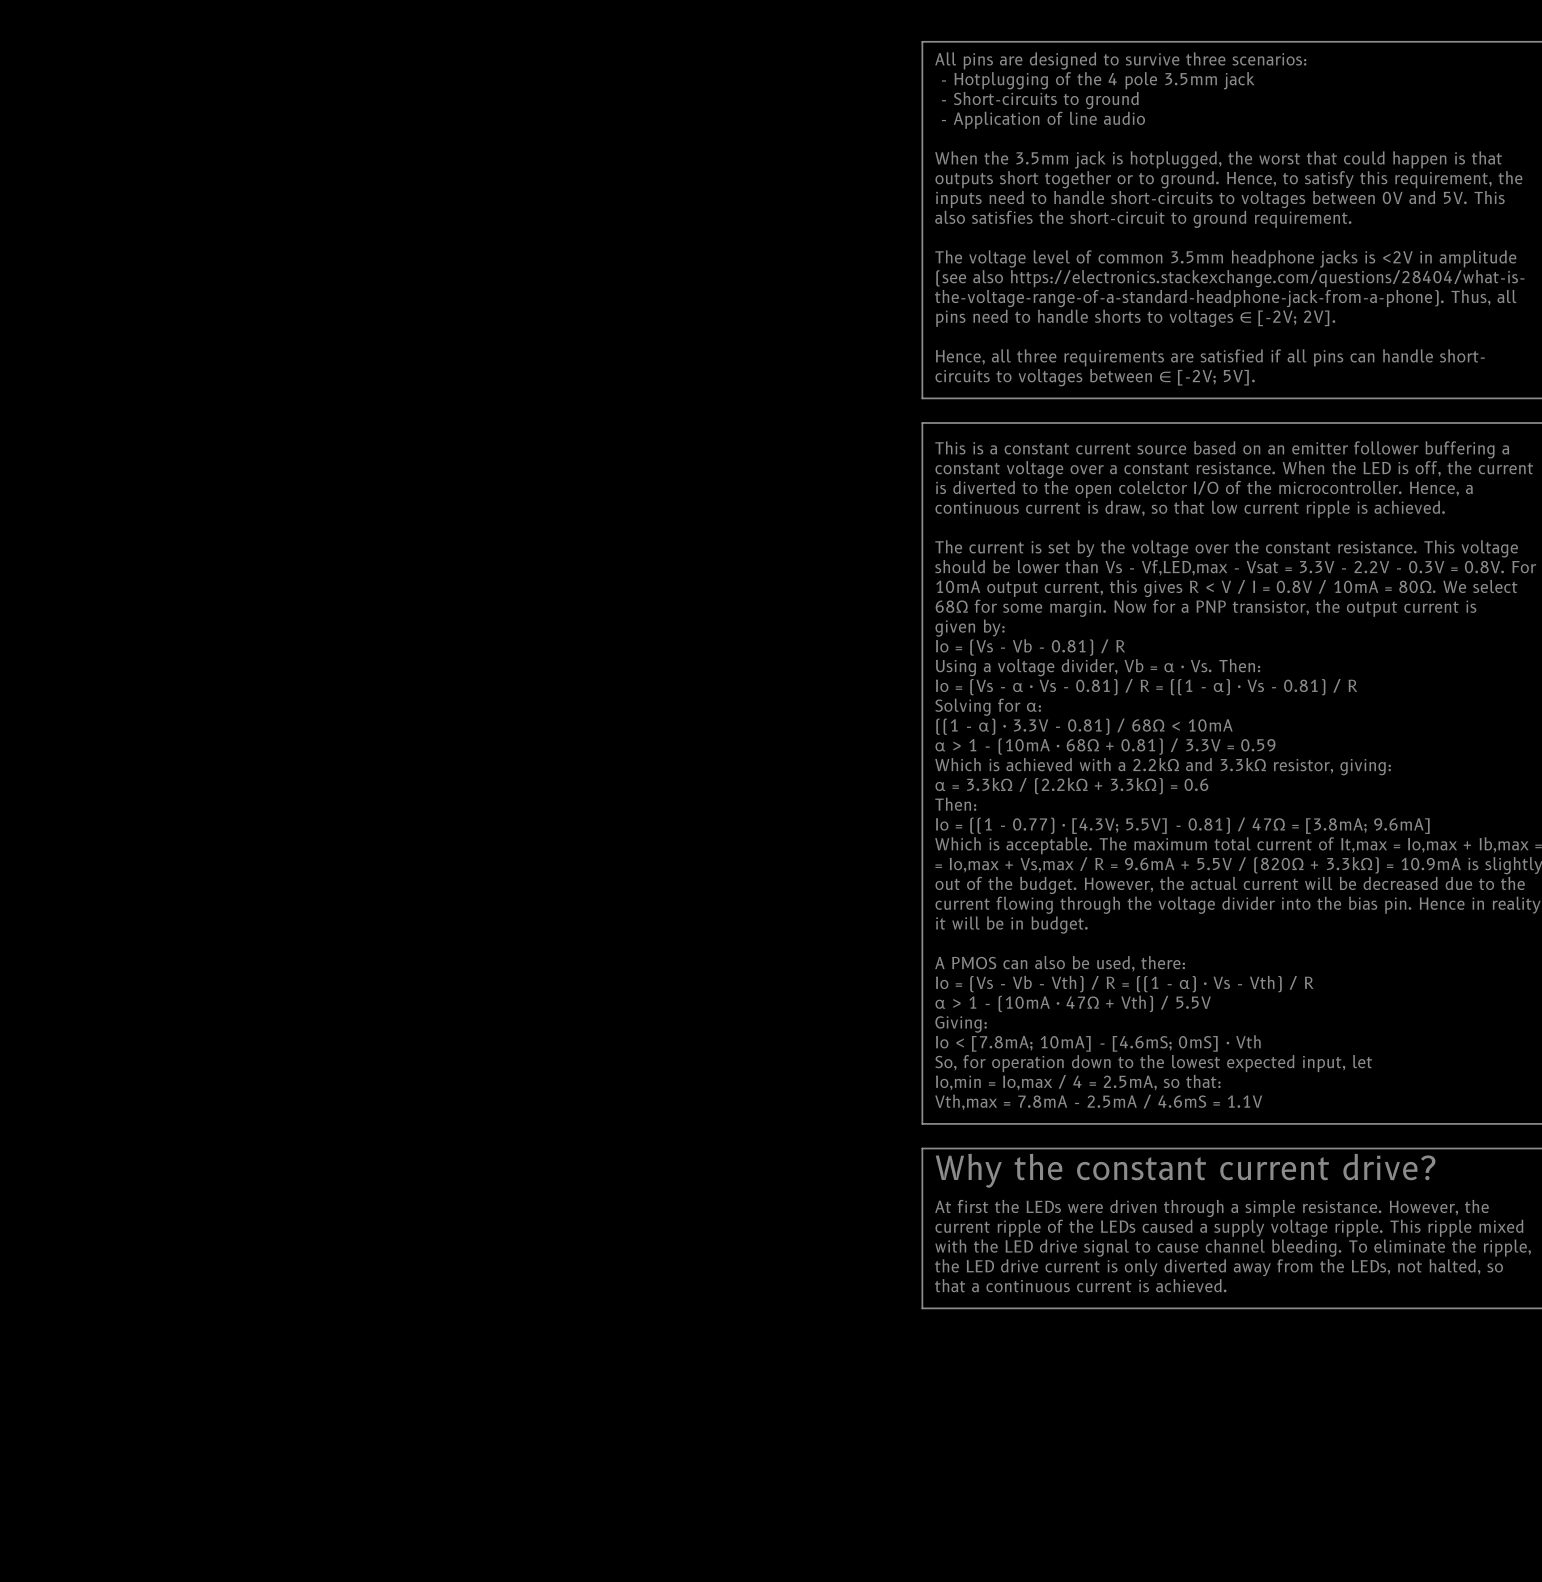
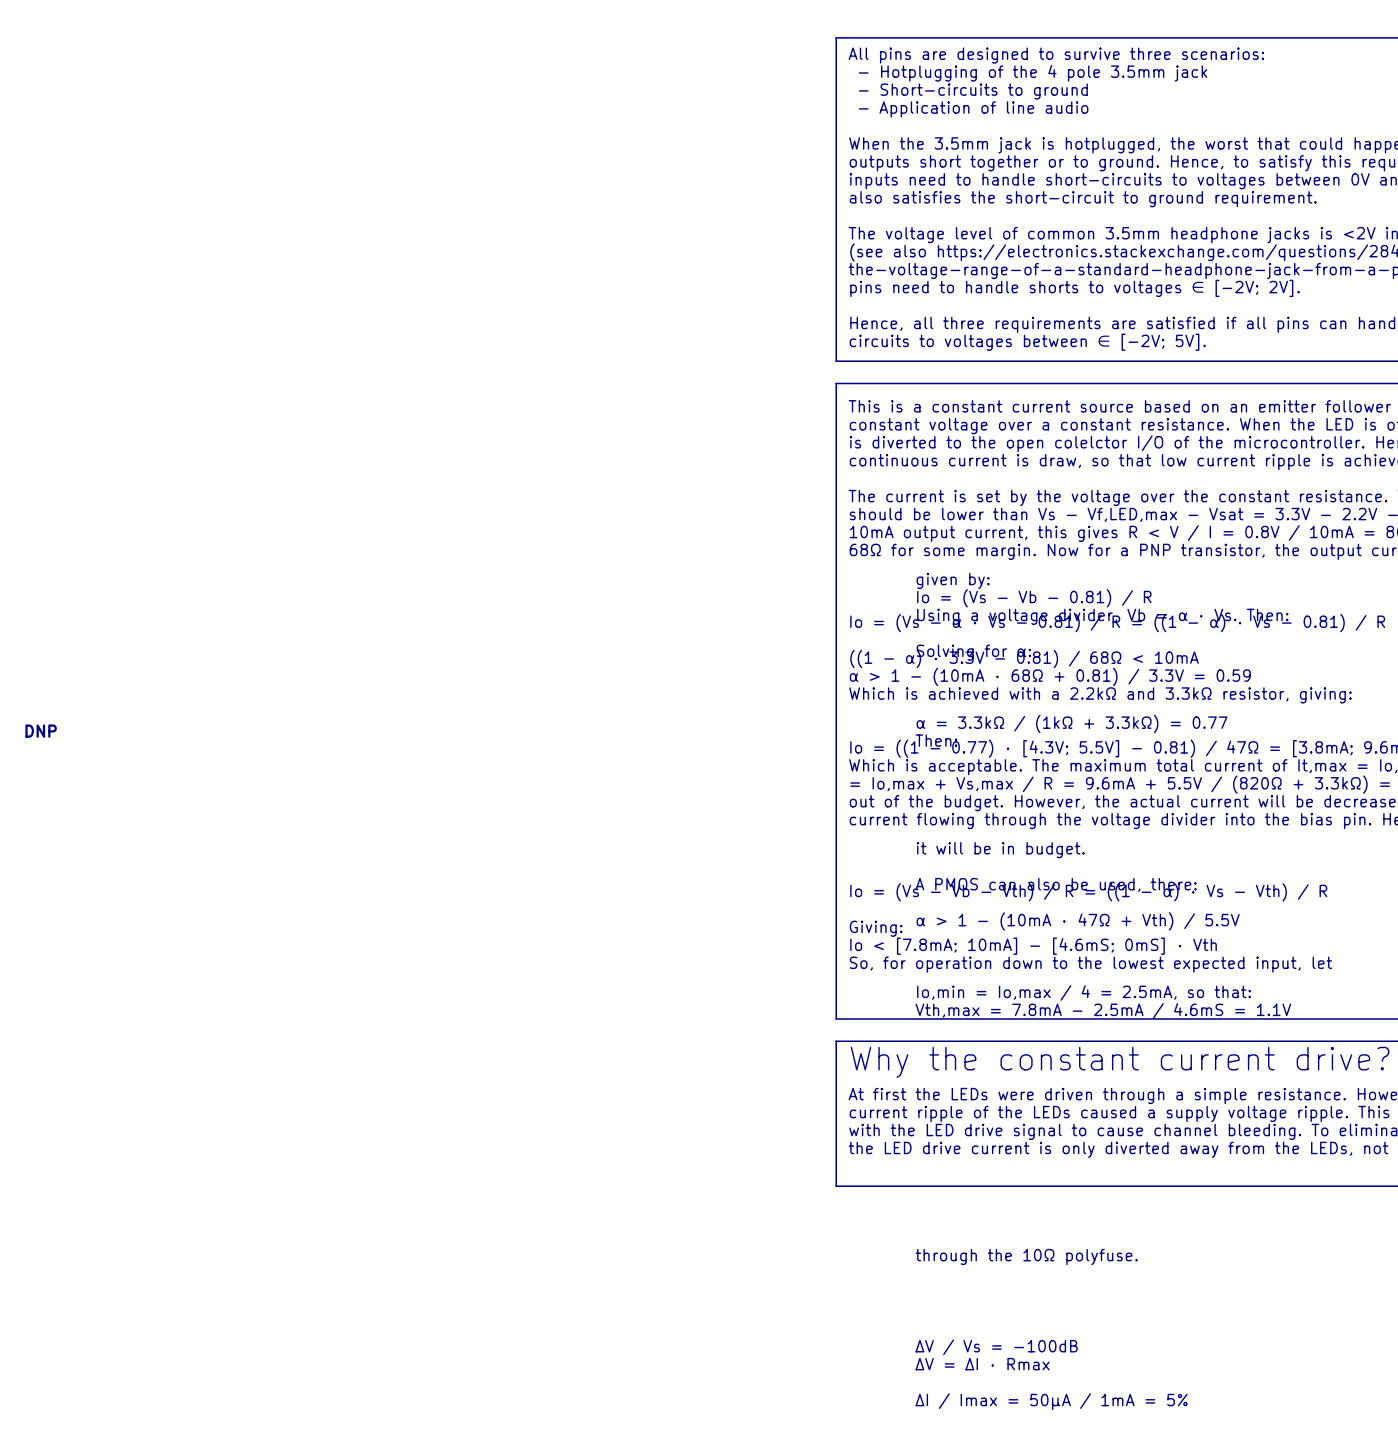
text position: given by: (970, 628) -> given by: (953, 580)
text position: Io = (Vs - Vb - 0.81) / R (1030, 647) -> Io = (Vs - Vb - 0.81) / R (1034, 598)
text position: Using a voltage divider, Vb = α · Vs. Then: (1098, 667) -> Using a voltage divider, Vb = α · Vs. Then: (1102, 616)
text position: Solving for α: (988, 707) -> Solving for α: (973, 652)
text: α = 3.3kΩ / (2.2kΩ + 3.3kΩ) = 0.6 (1071, 786) -> α = 3.3kΩ / (1kΩ + 3.3kΩ) = 0.77 (1072, 723)
text position: Then: (955, 804) -> Then: (936, 740)
text: none -> DNP (41, 731)
text position: it will be in budget. (1011, 925) -> it will be in budget. (1000, 850)
text position: A PMOS can also be used, there: (1060, 963) -> A PMOS can also be used, there: (1056, 884)
text position: α > 1 - (10mA · 47Ω + Vth) / 5.5V (1073, 1003) -> α > 1 - (10mA · 47Ω + Vth) / 5.5V (1078, 921)
text position: Io,min = Io,max / 4 = 2.5mA, so that: (1078, 1082) -> Io,min = Io,max / 4 = 2.5mA, so that: (1083, 992)
text position: Vth,max = 7.8mA - 2.5mA / 4.6mS = 1.1V (1098, 1102) -> Vth,max = 7.8mA - 2.5mA / 4.6mS = 1.1V (1103, 1010)
text: that a continuous current is achieved. (1080, 1285) -> none
text: none -> through the 10Ω polyfuse. (1026, 1256)
text: none -> ΔV / Vs = -100dB (996, 1347)
text: none -> ΔV = ΔI · Rmax (982, 1364)
text: none -> ΔI / Imax = 50µA / 1mA = 5% (1051, 1401)

